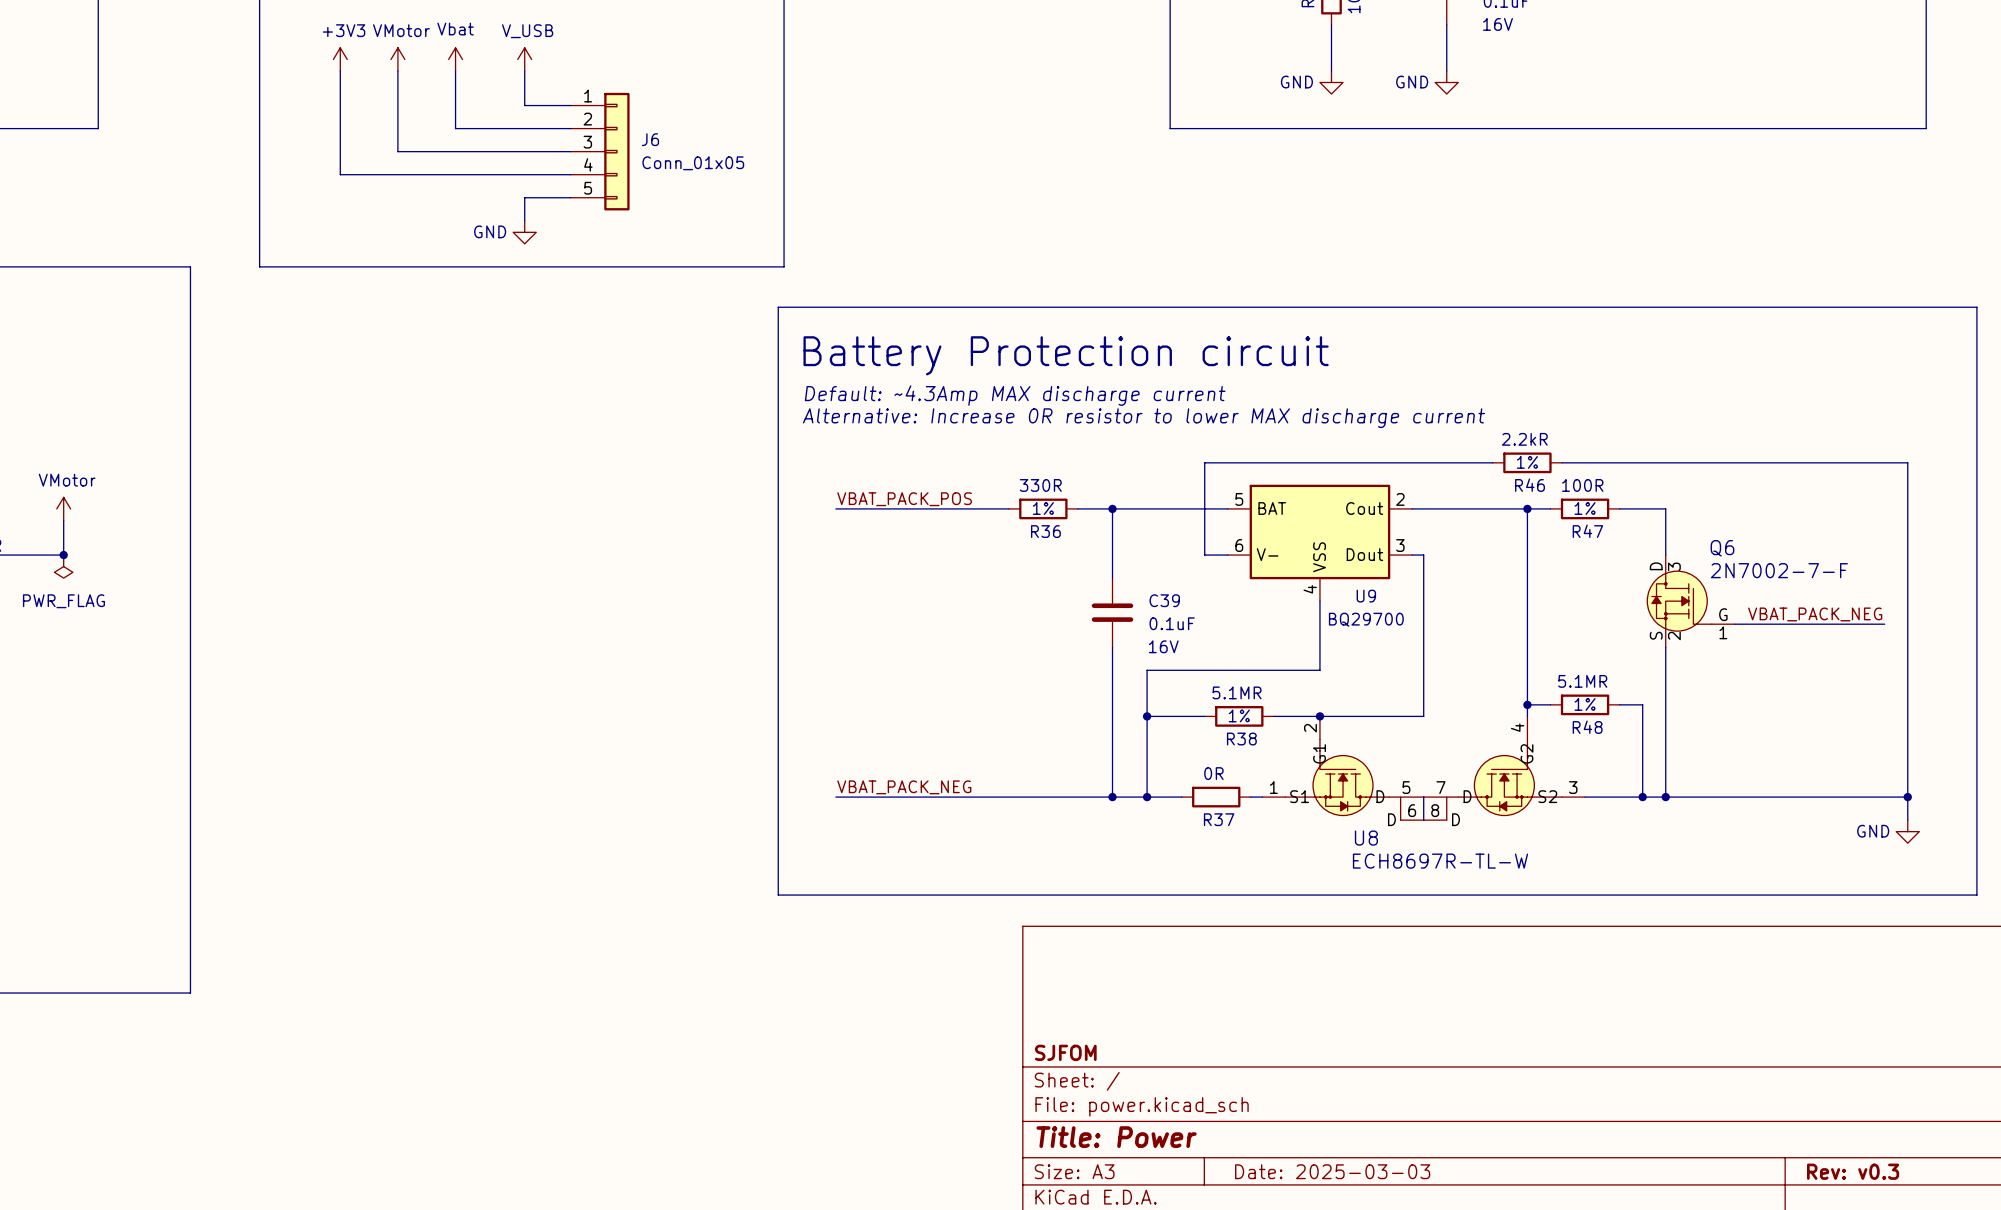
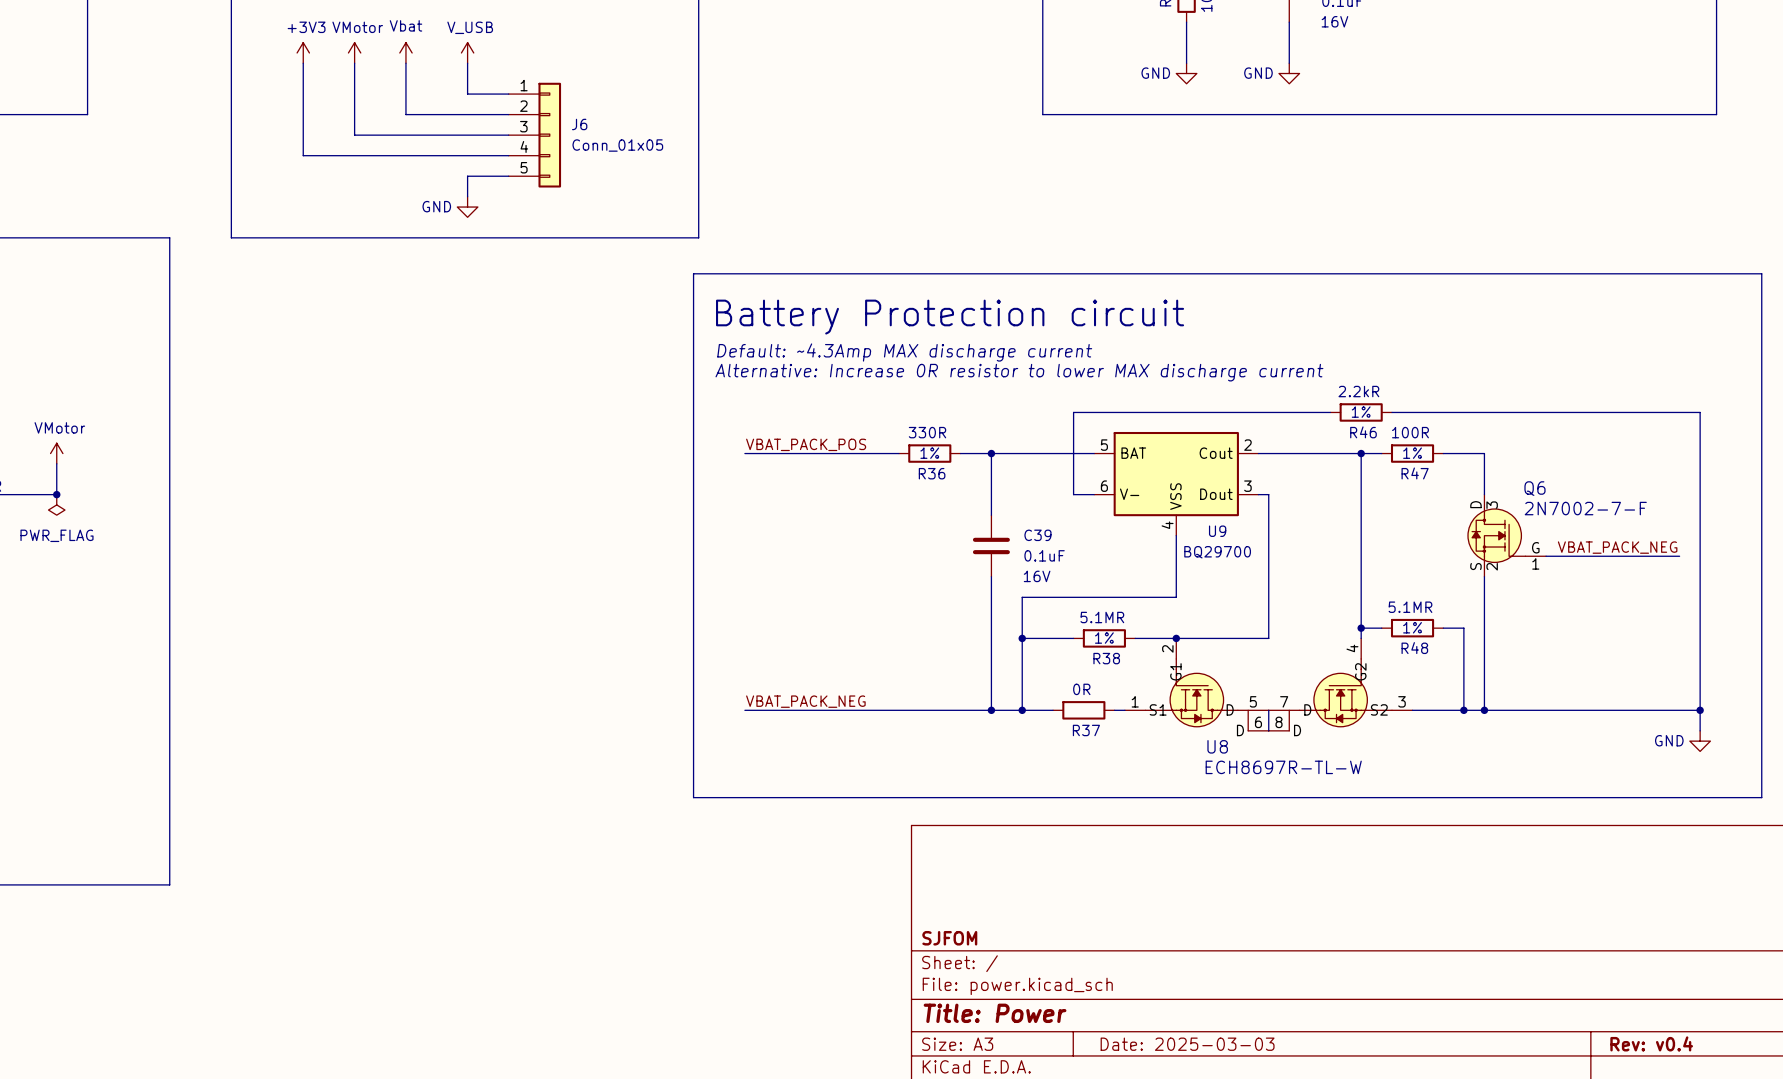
title block: Rev: v0.3 (1853, 1171) -> Rev: v0.4 (1651, 1043)

